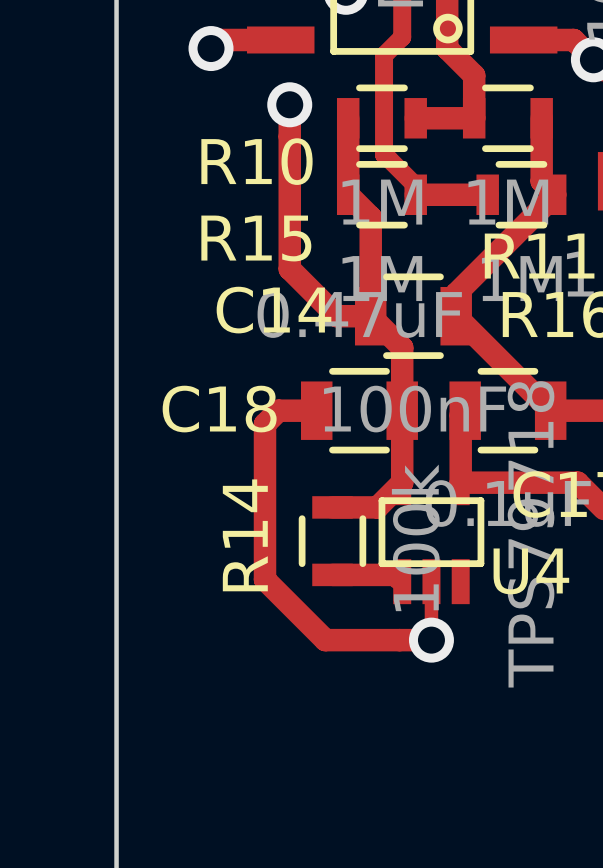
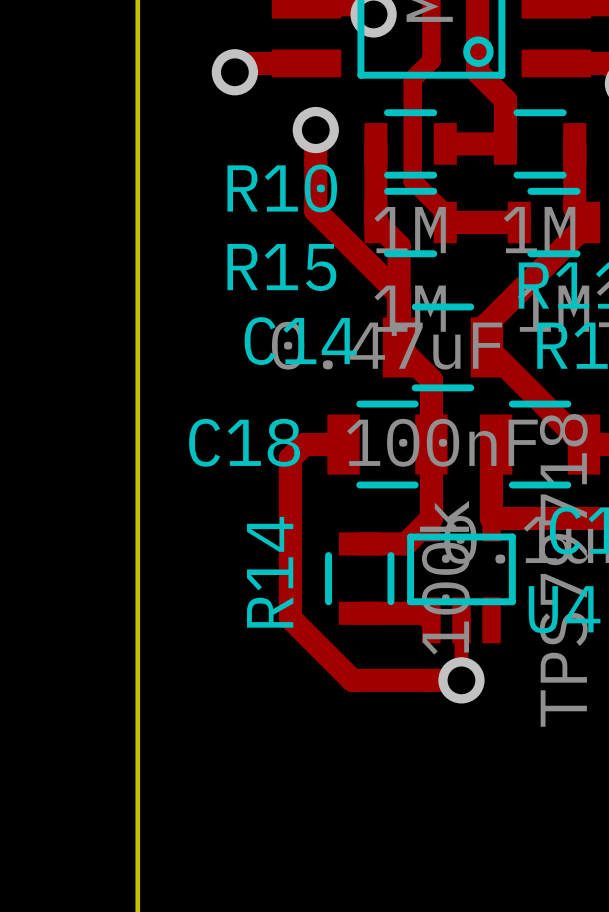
track: (289, 183) (289, 268) (336, 316) (370, 316) -> (315, 210) (399, 294)

